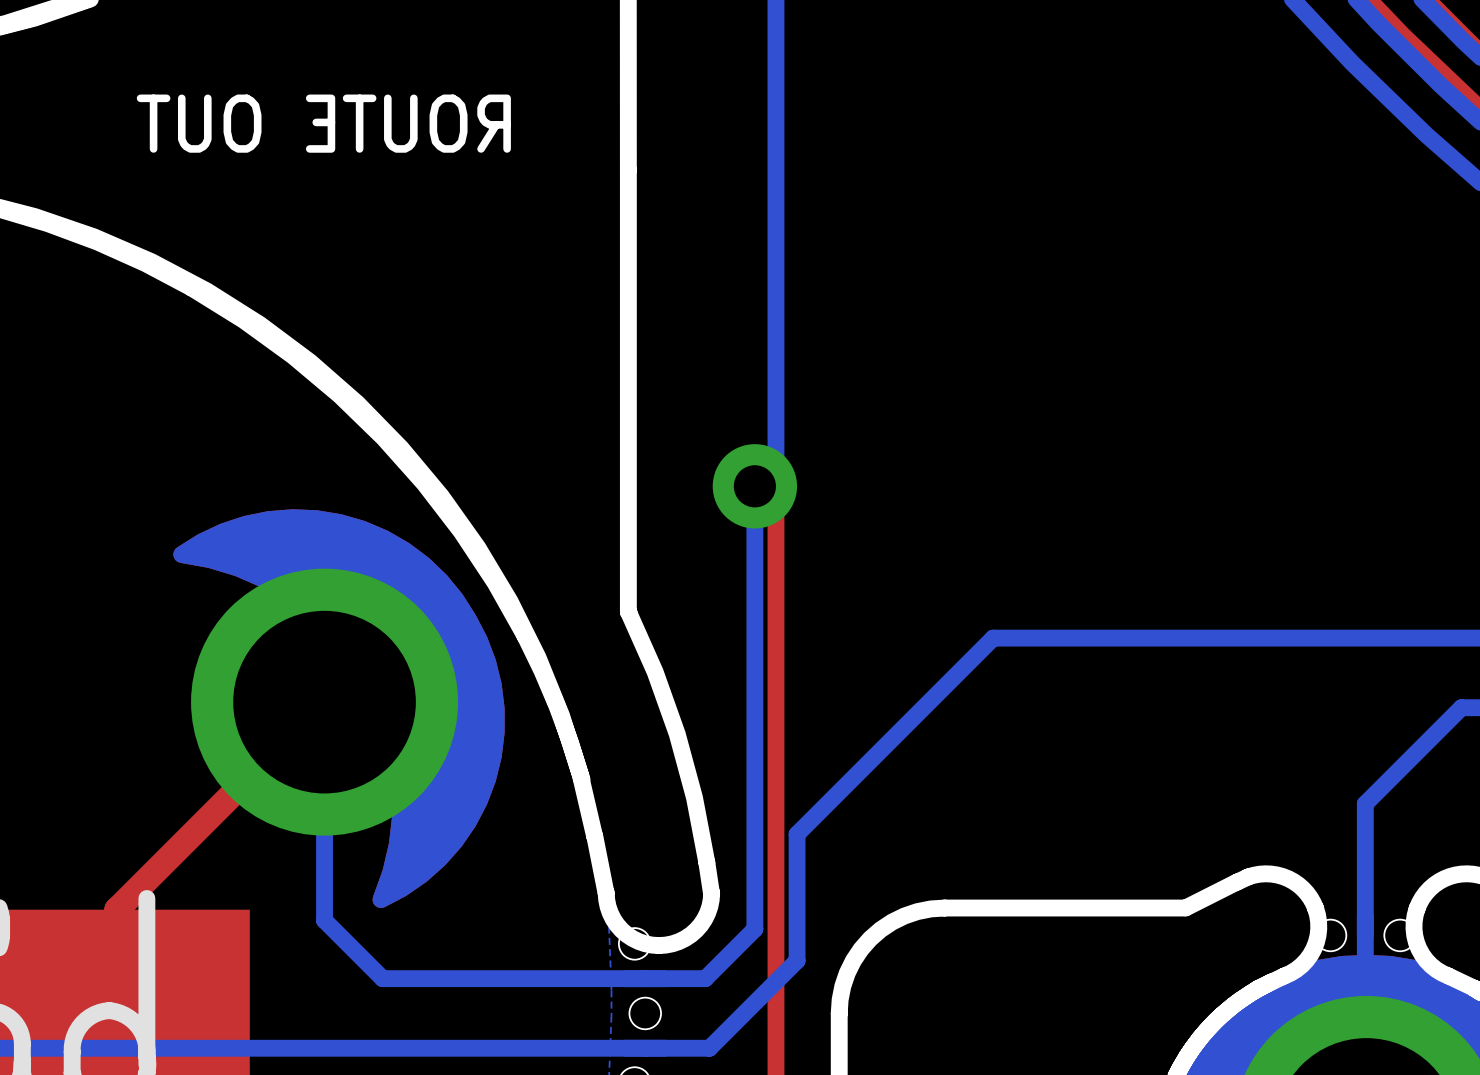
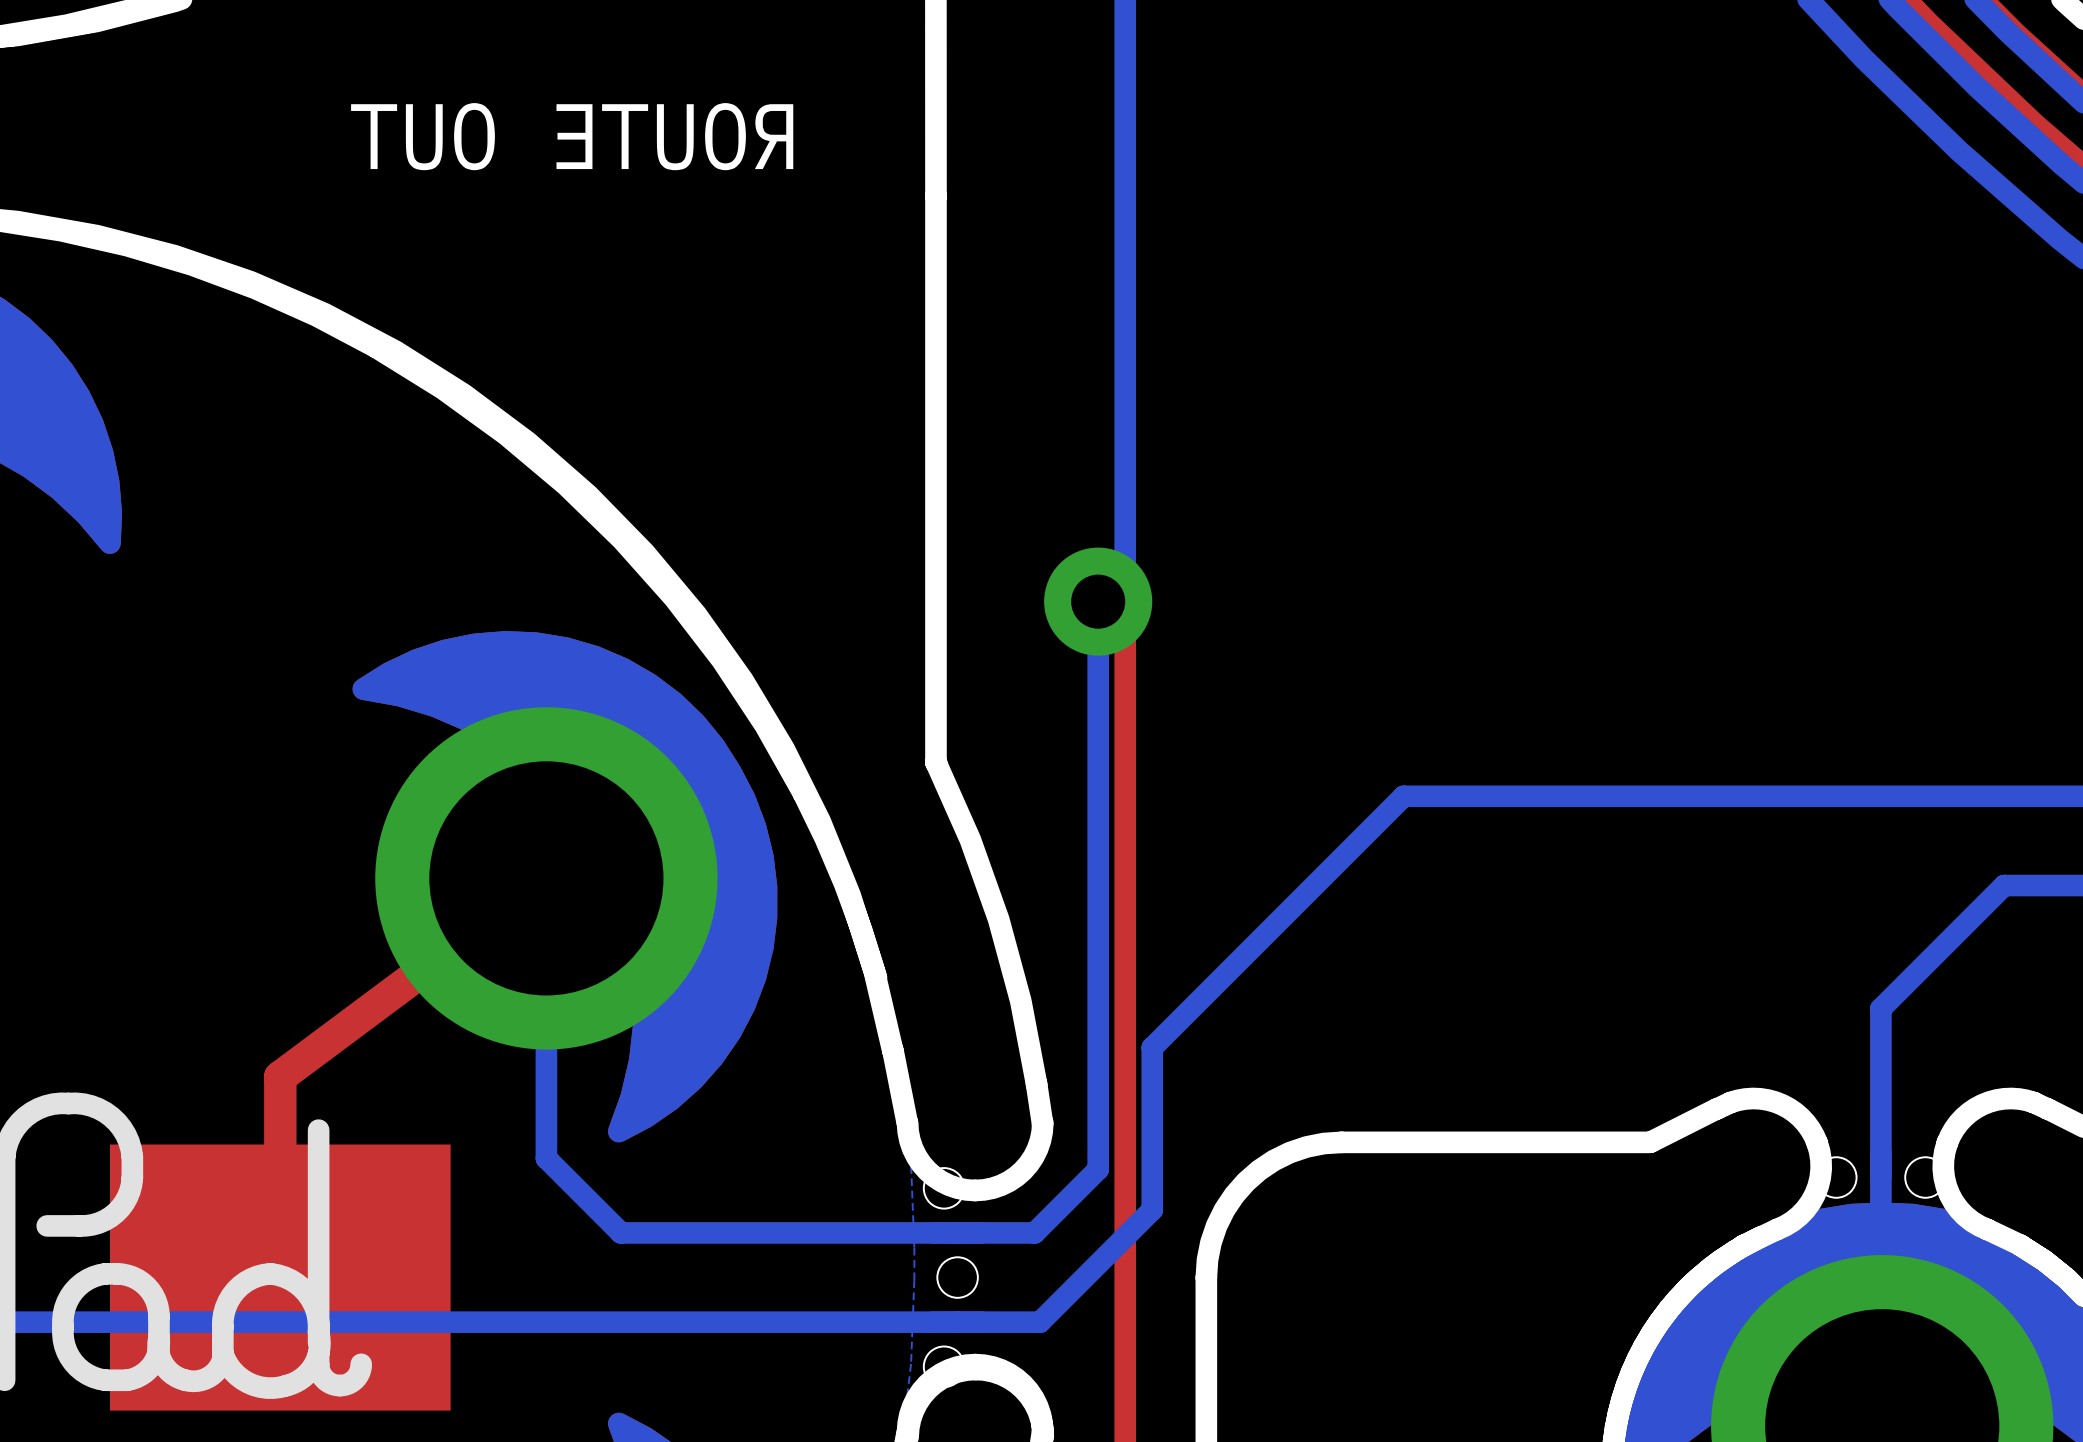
top track: (324, 702) (117, 909) -> (546, 878) (280, 1076) (280, 1144)

